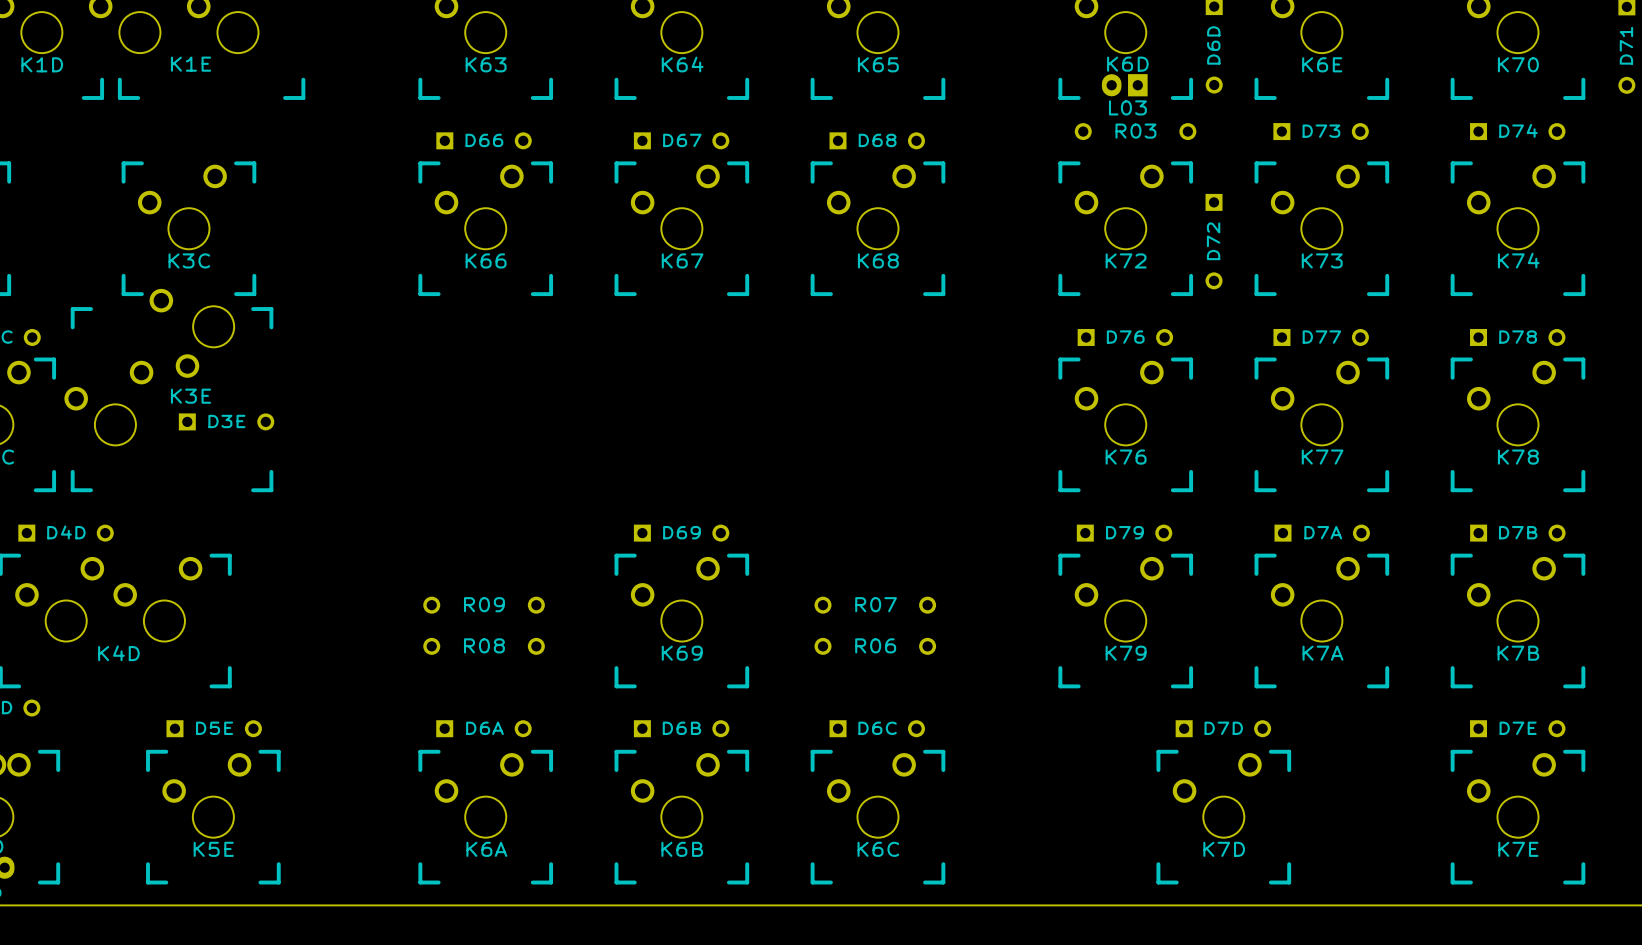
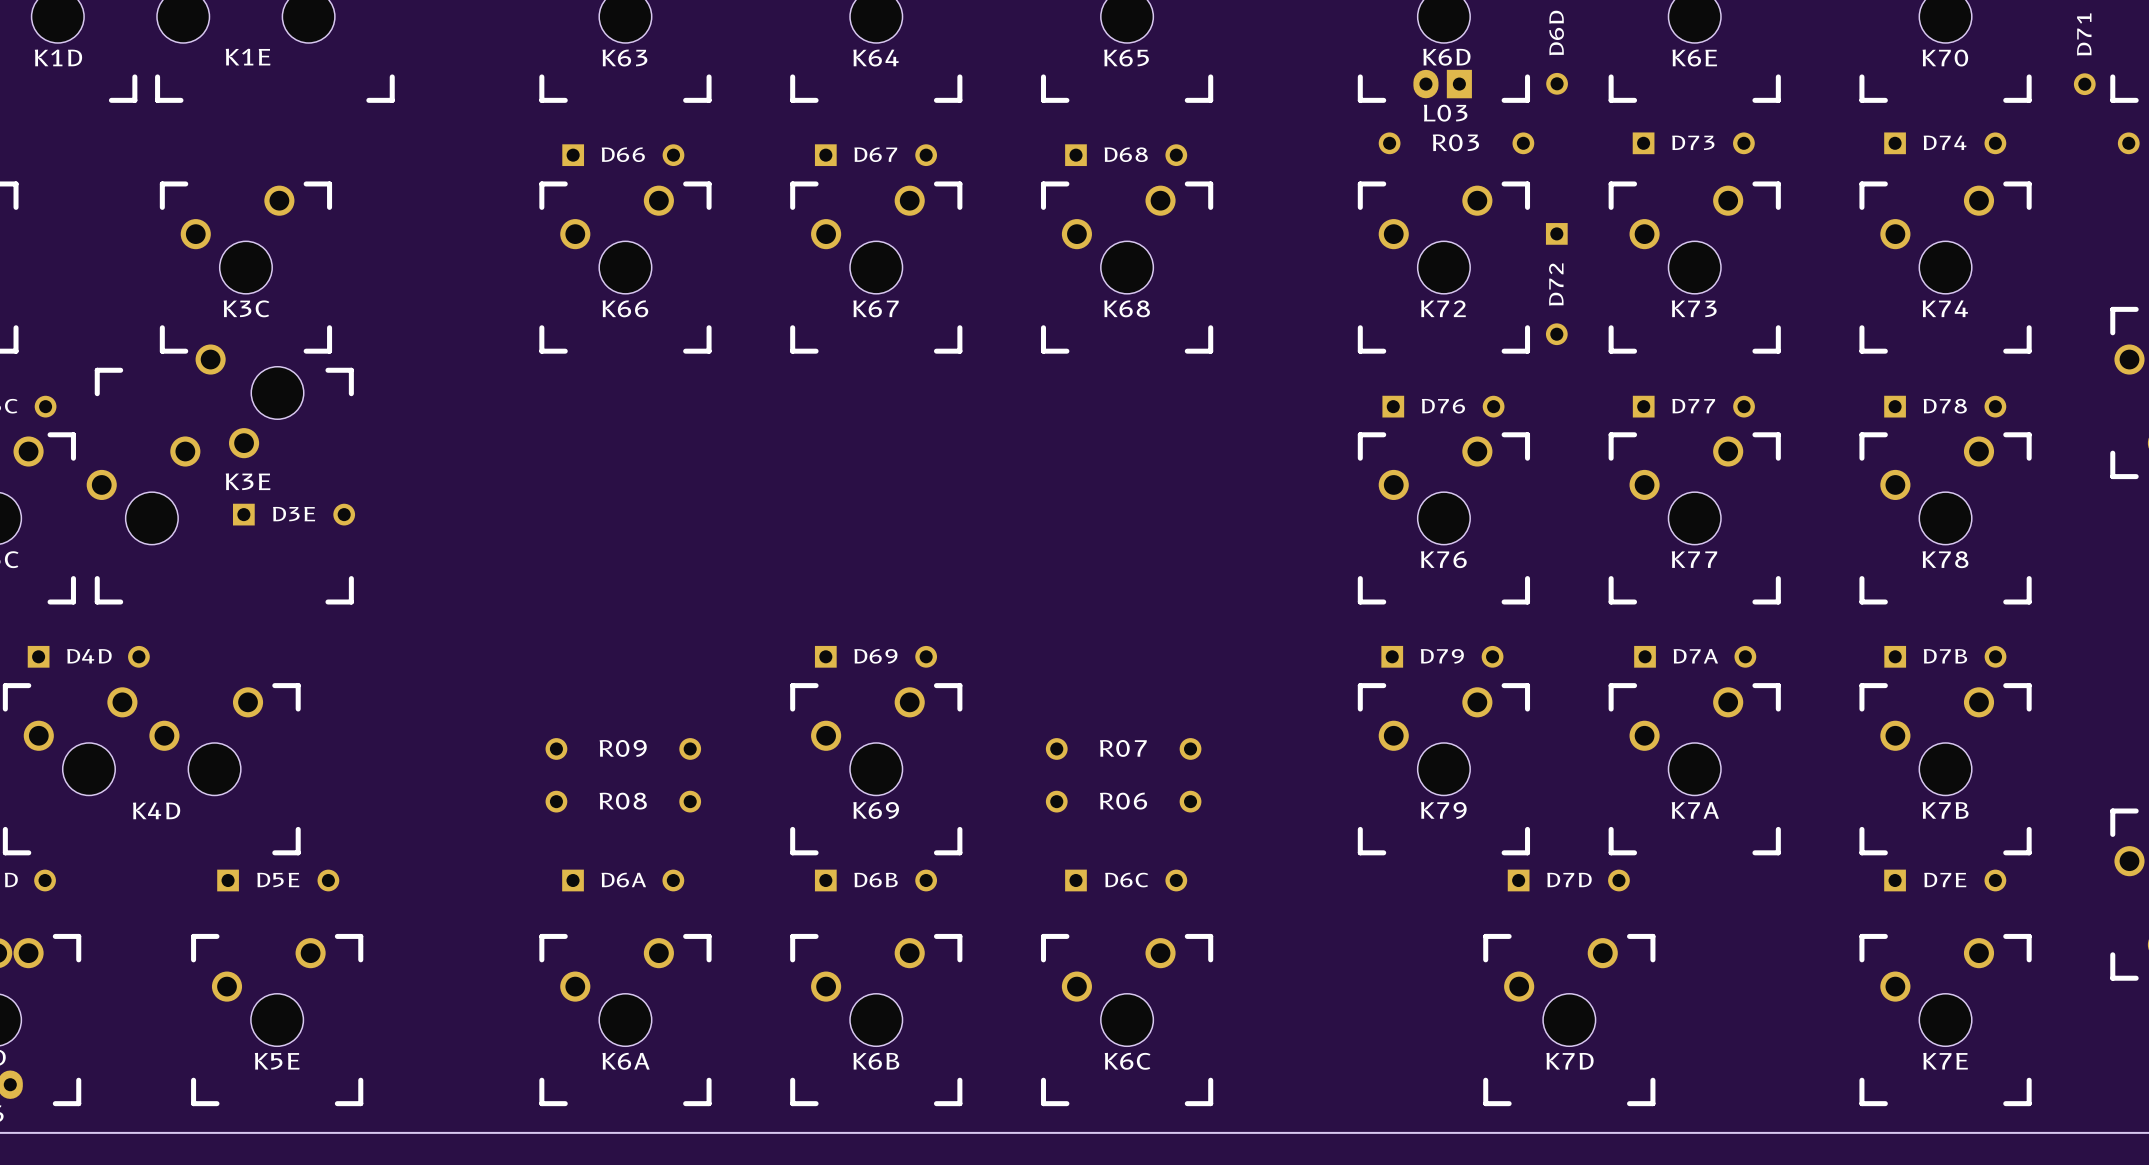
D5E position: (214, 728) -> (278, 880)
D6A position: (483, 728) -> (623, 880)
D6B position: (681, 728) -> (875, 880)
D6C position: (877, 728) -> (1126, 880)
D7D position: (1223, 728) -> (1568, 880)
D7E position: (1517, 728) -> (1945, 880)

